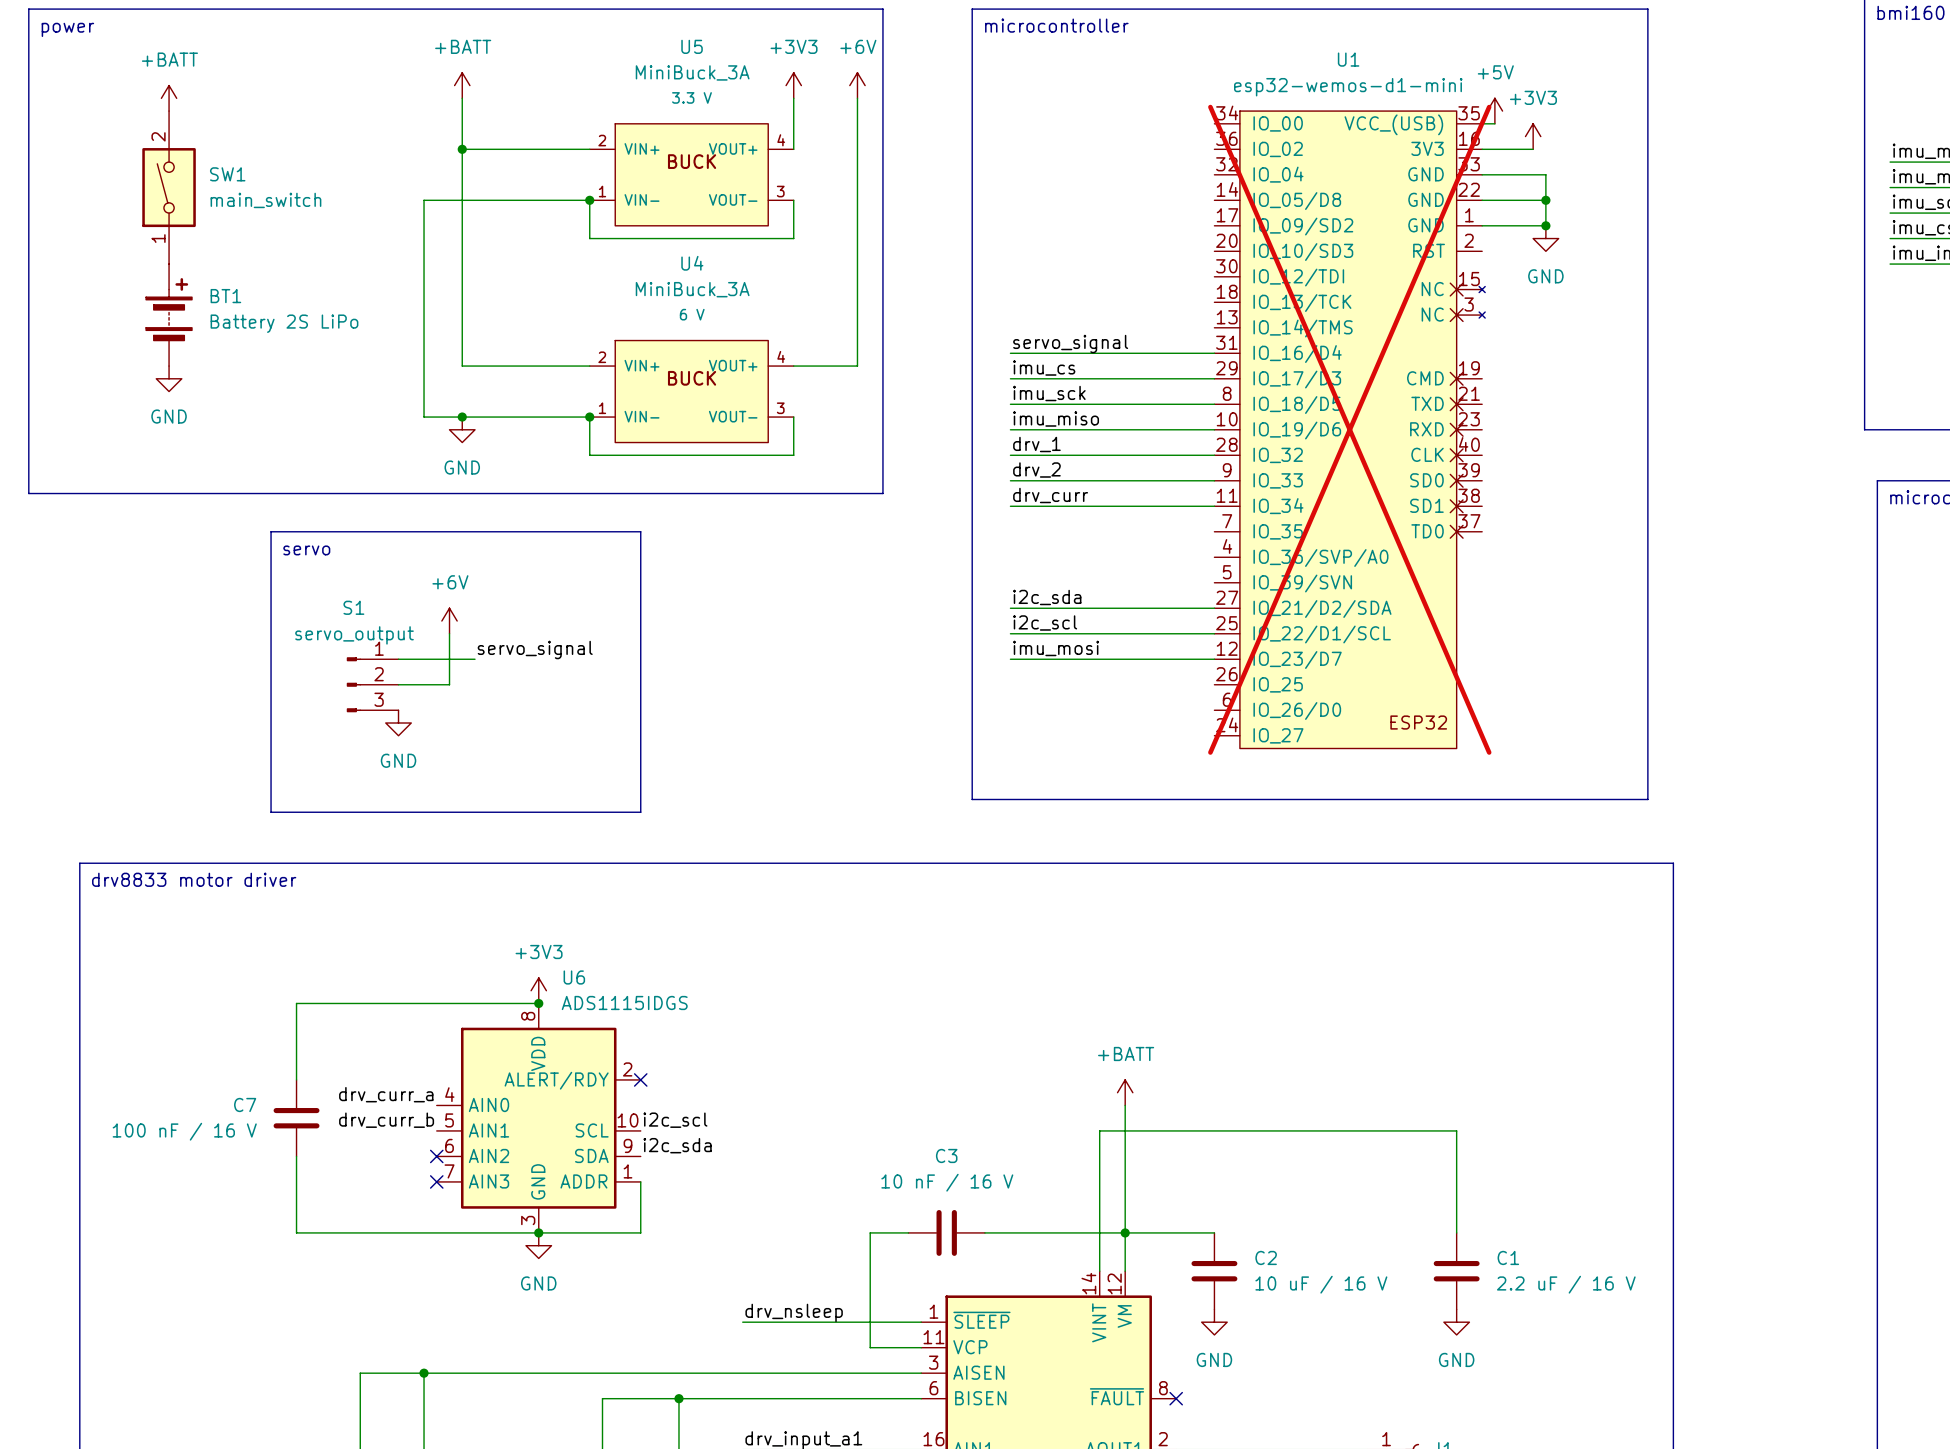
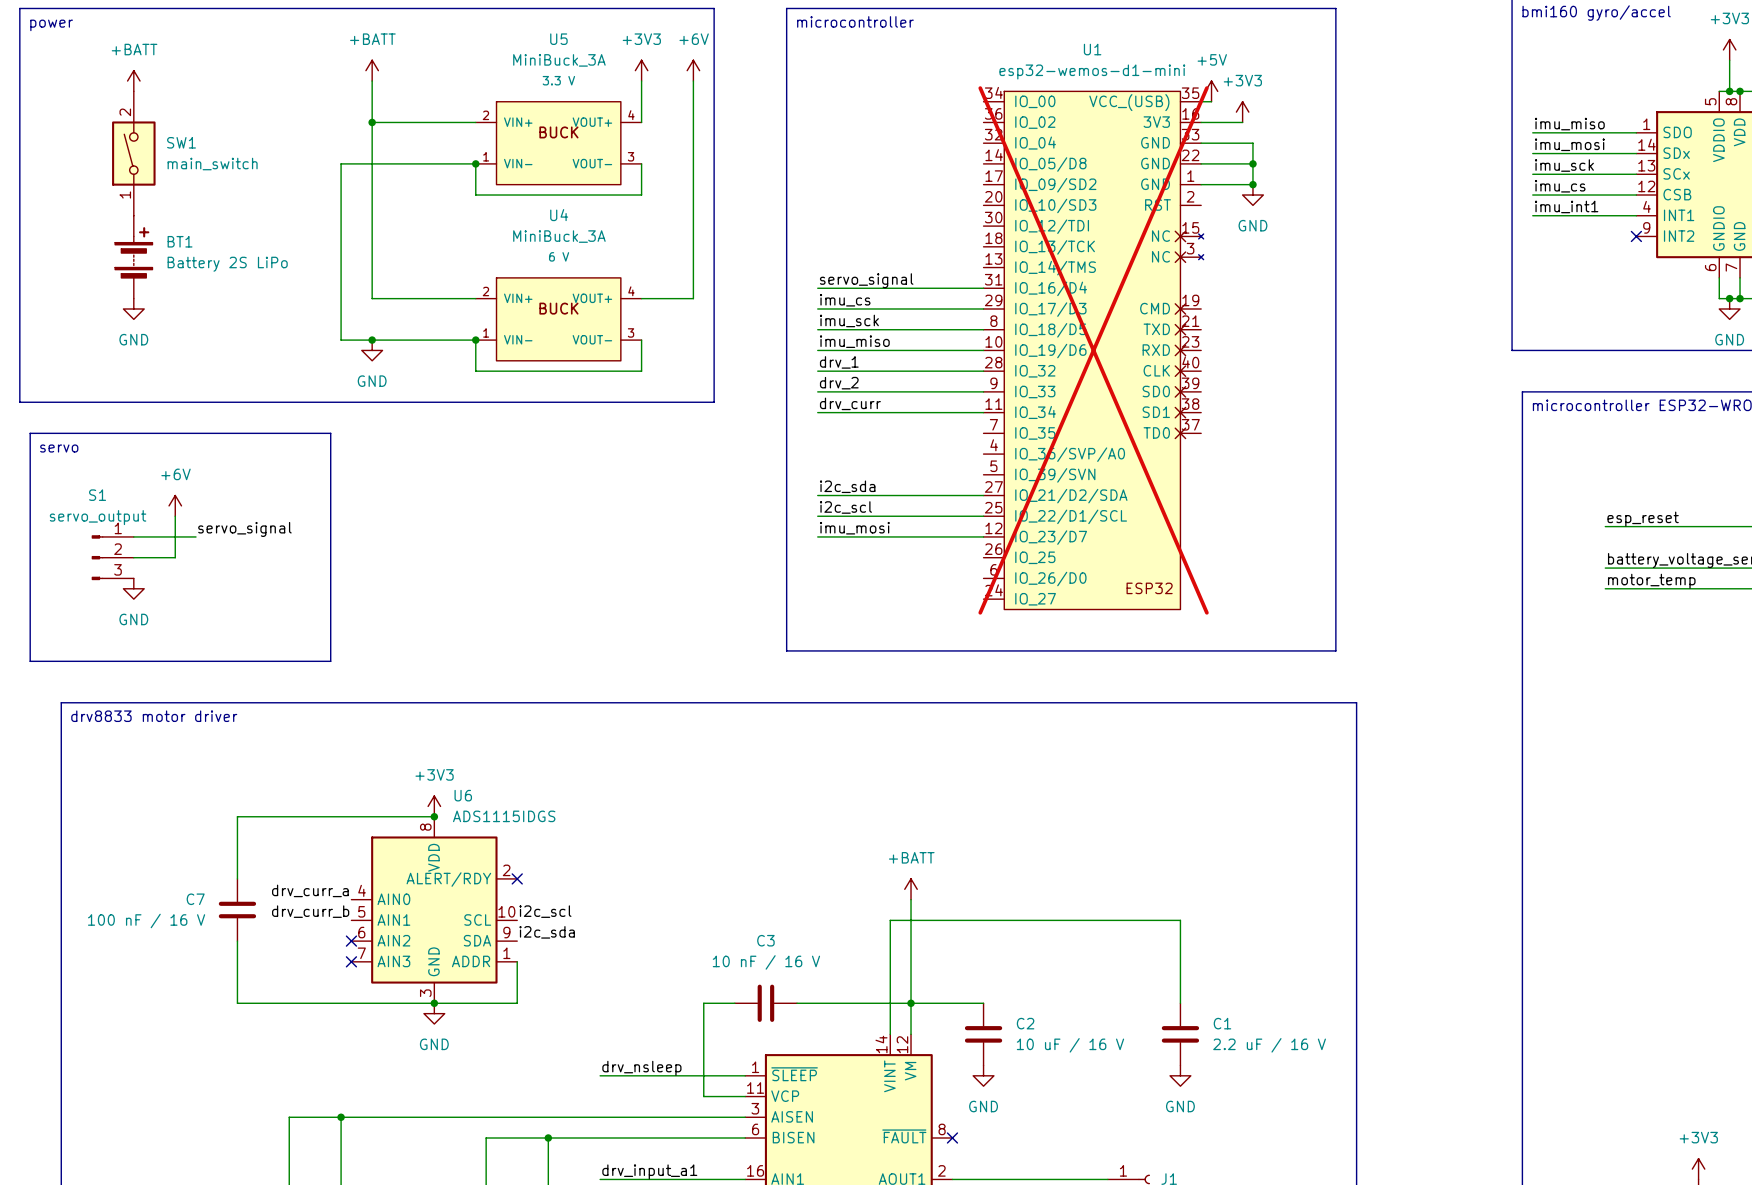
line: (271, 531) (271, 812) -> (216, 433) (30, 433) (30, 661) (216, 661)
line: (411, 531) (640, 531) (640, 812) (411, 812) -> (330, 433) (330, 661)
text position: servo (306, 550) -> servo (59, 448)
power symbol position: +6V (449, 621) -> +6V (175, 505)
wire: (449, 633) (449, 684) (398, 684) -> (175, 516) (175, 557) (133, 557)
label position: servo_signal (535, 650) -> servo_signal (244, 529)
wire: (398, 659) (475, 659) -> (133, 536) (195, 536)
S1 position: (372, 684) -> (112, 557)
power symbol position: GND (398, 723) -> GND (133, 588)

